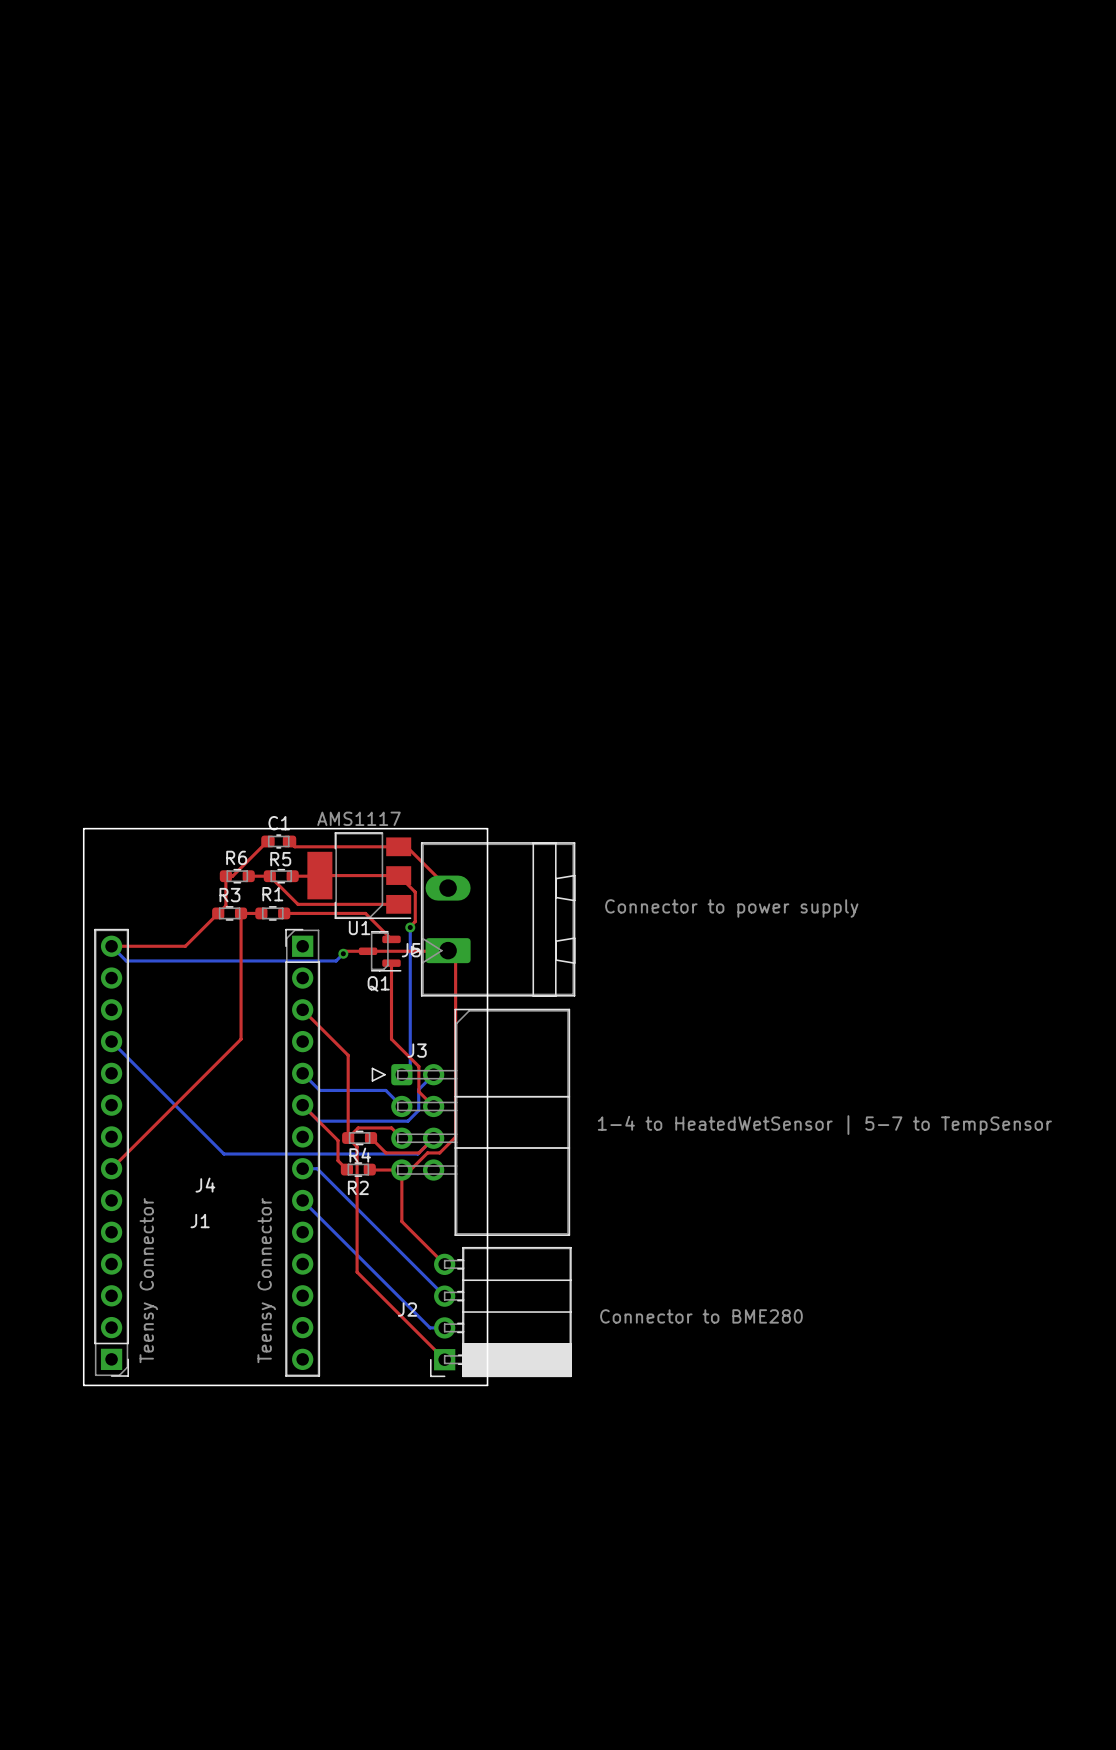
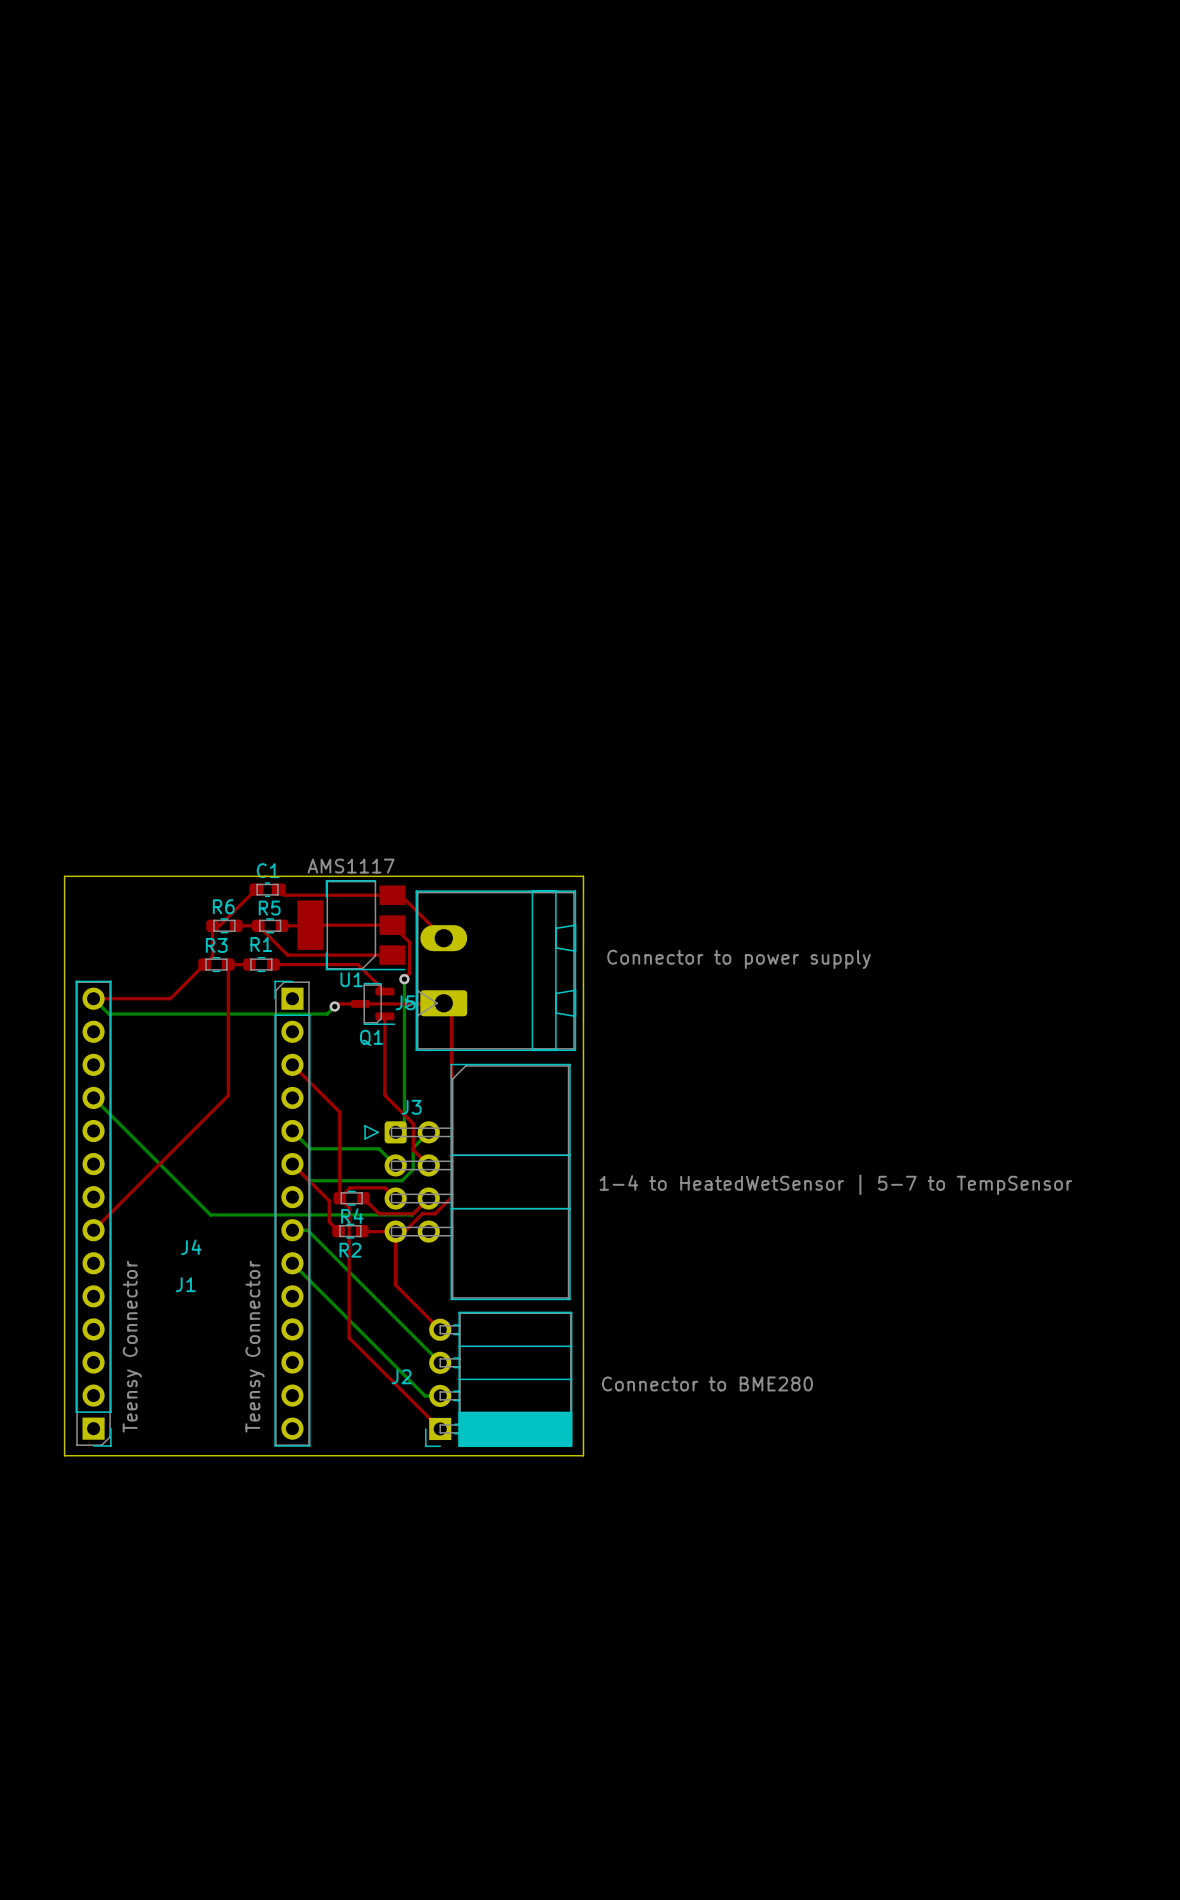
board edge: (487, 828) (487, 1385) -> (484, 876) (583, 876) (583, 1455) (484, 1455)

